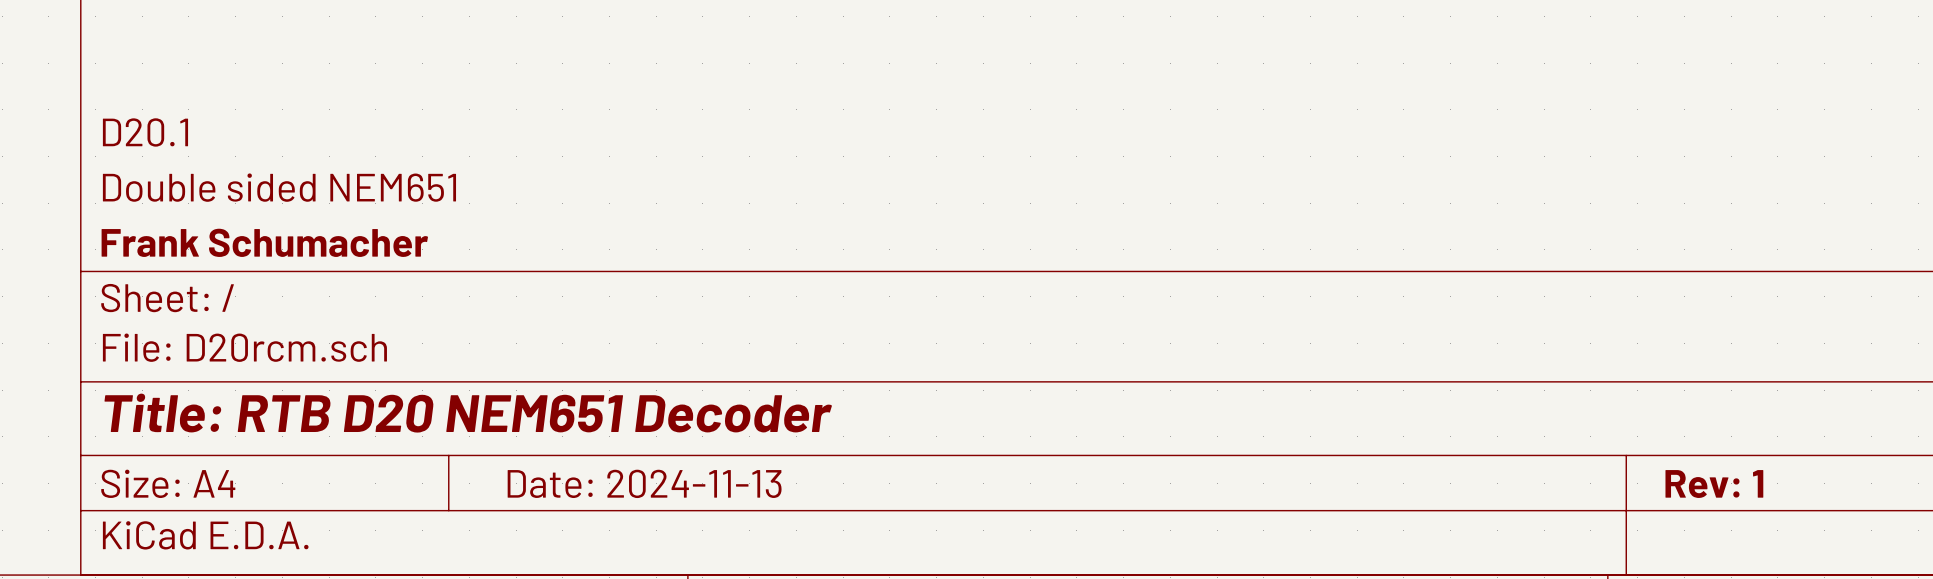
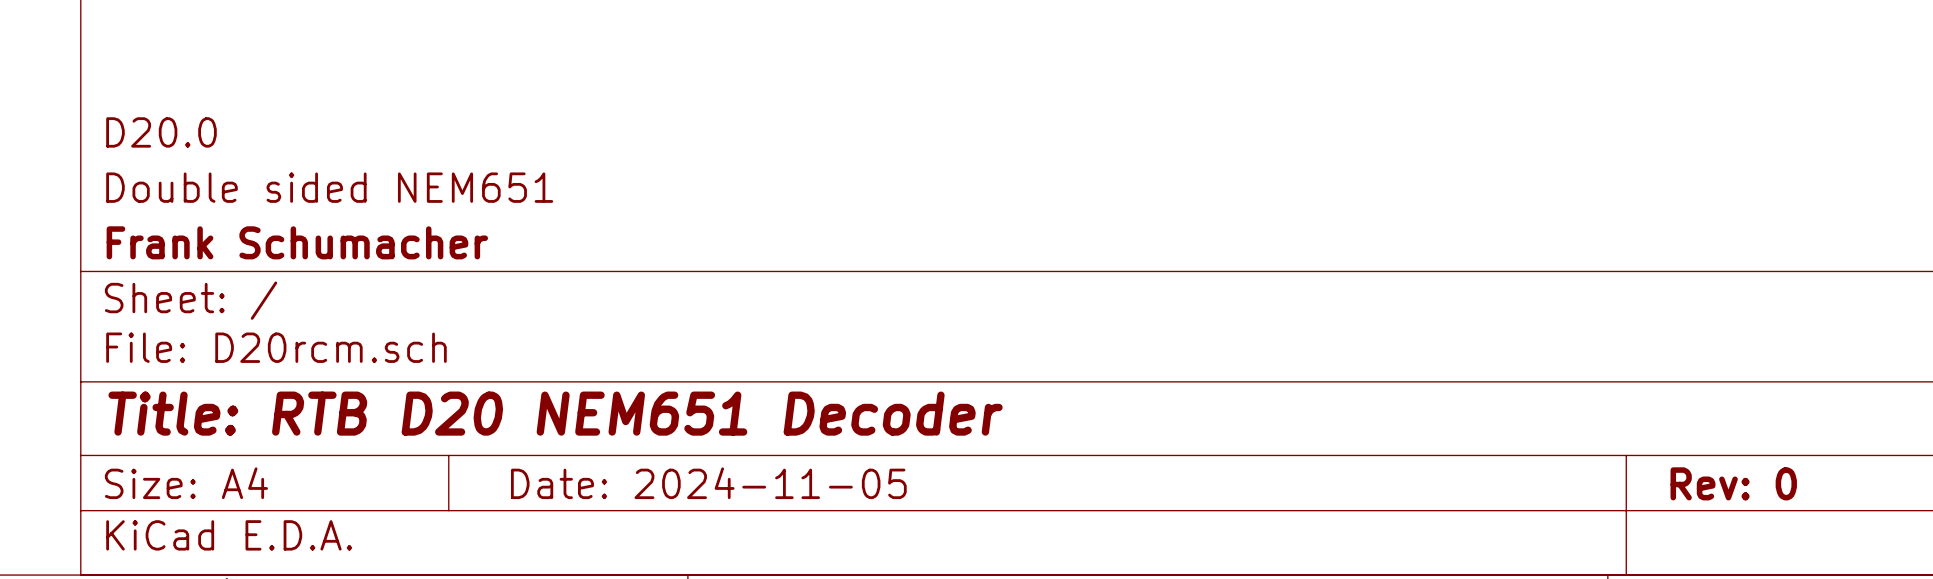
title block: D20.1 (145, 132) -> D20.0 (161, 132)
title block: Date: 2024-11-13 (644, 483) -> Date: 2024-11-05 (708, 483)
title block: Rev: 1 (1714, 484) -> Rev: 0 (1733, 483)

